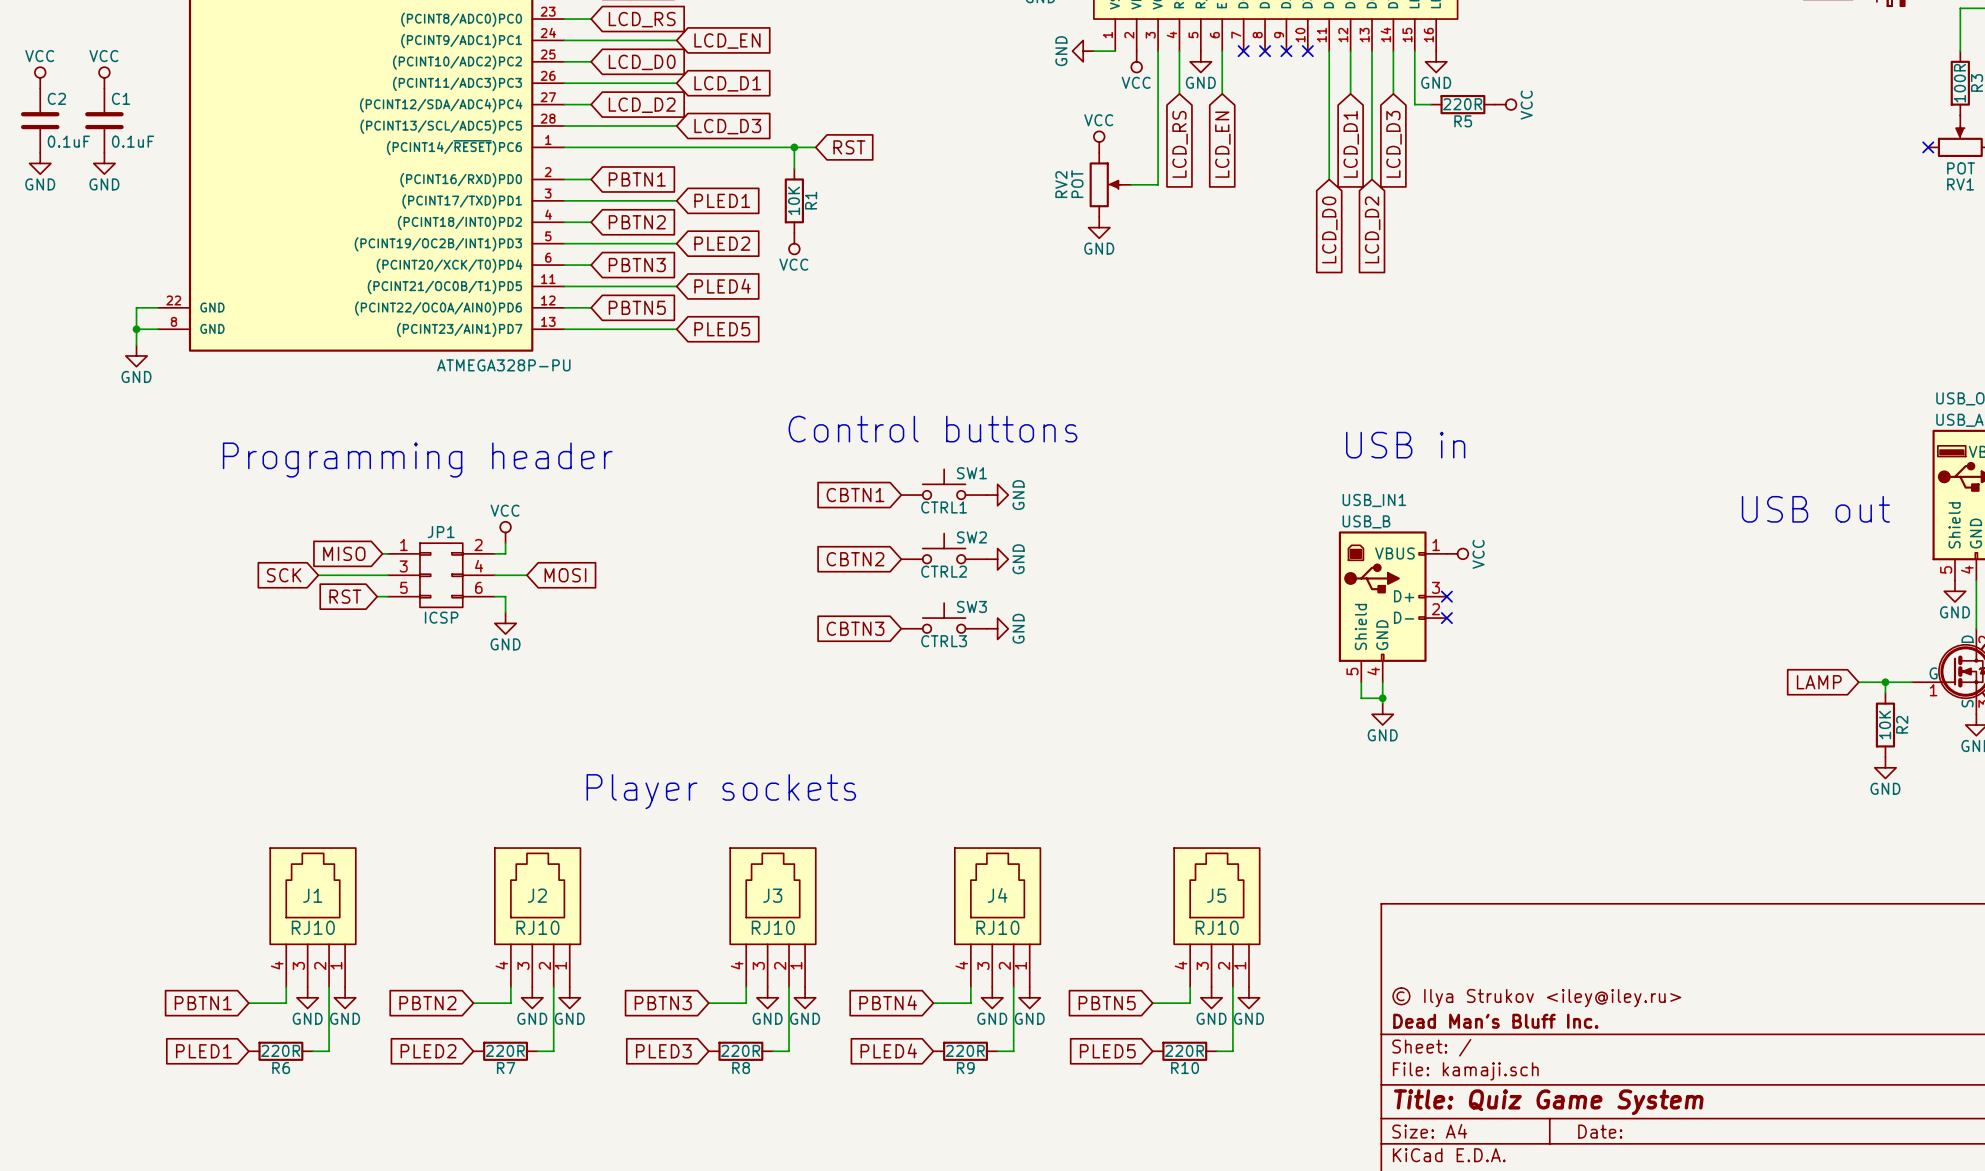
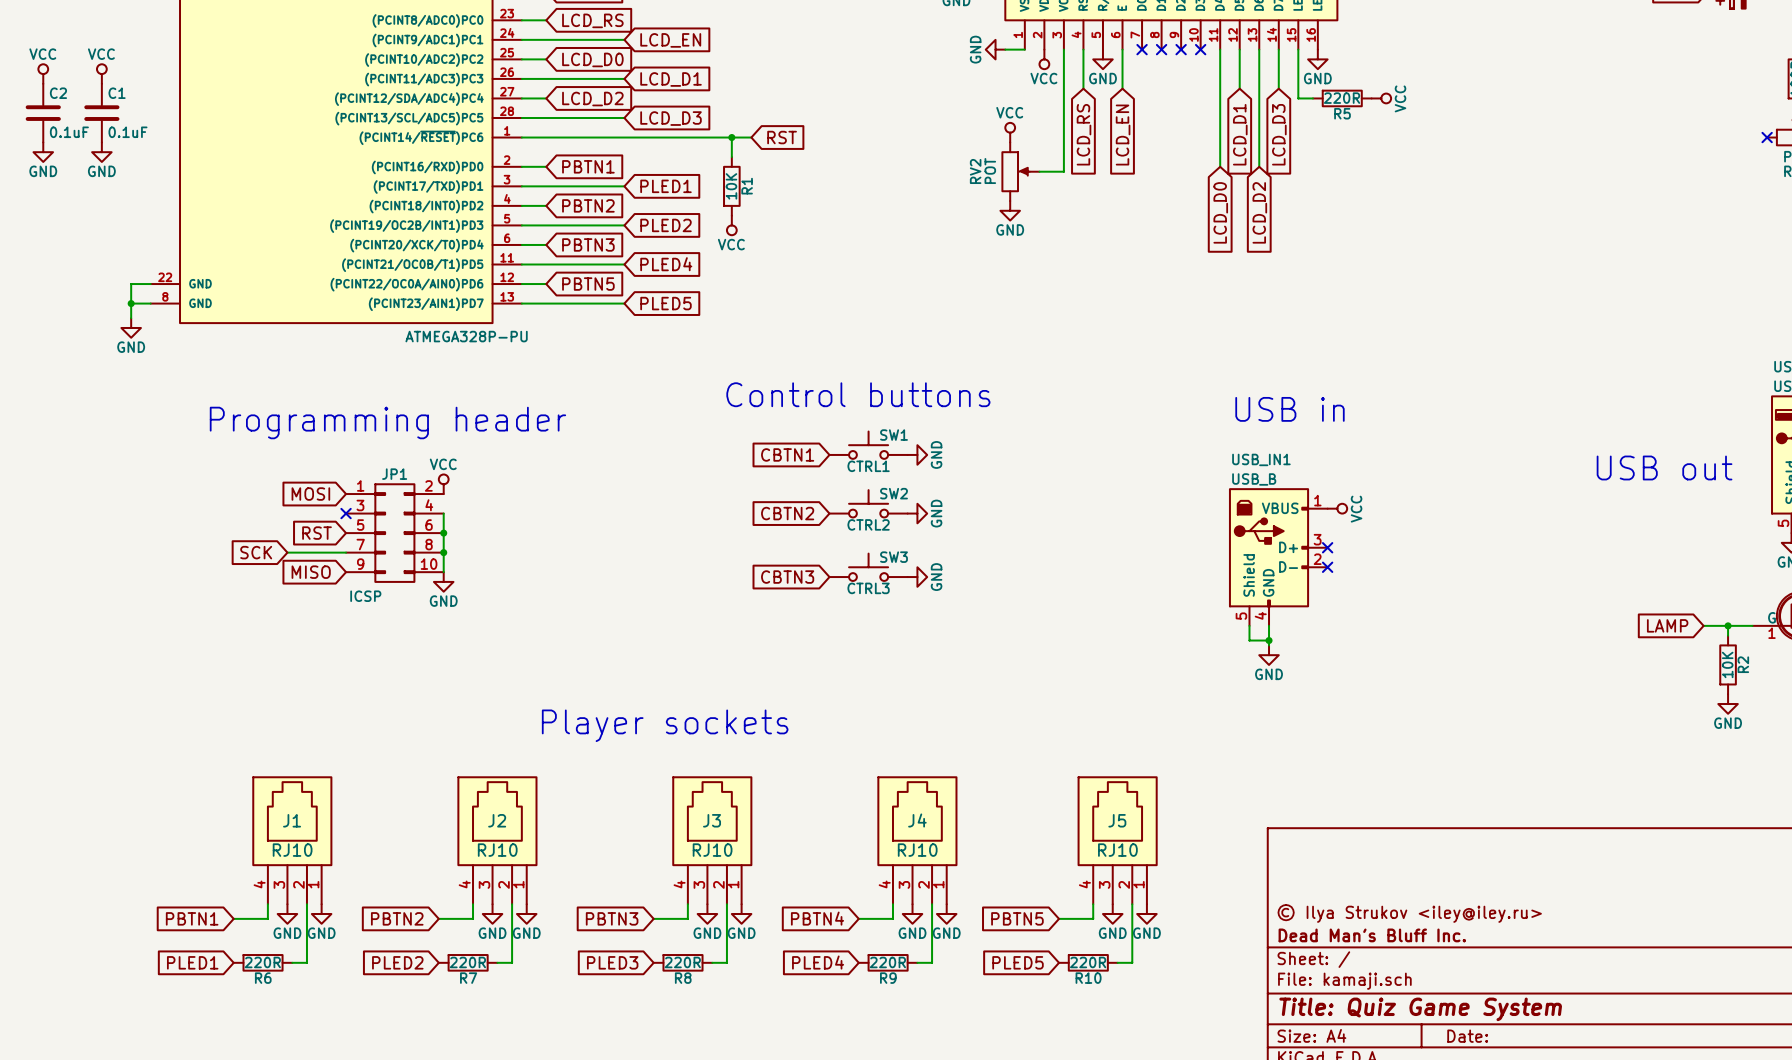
JP1 name position: JP1 (441, 532) -> JP1 (394, 474)
power symbol position: VCC (505, 532) -> VCC (443, 484)
JP1 symbol: [387, 543, 495, 608] -> [346, 484, 444, 582]
wire: (505, 543) (505, 553) (494, 553) -> none
global label position: MISO (344, 553) -> MISO (311, 572)
wire: (382, 553) (387, 553) -> none
no-connect mark: none -> (346, 513)
wire: none -> (443, 513) (443, 572)
global label position: SCK (284, 575) -> SCK (256, 552)
wire: (318, 575) (387, 575) -> none
wire: (494, 575) (526, 575) -> none
global label rotation: 0° (565, 575) -> 180° (310, 494)
global label position: MOSI (565, 575) -> MOSI (310, 494)
junction: none -> (443, 533)
global label position: RST (345, 596) -> RST (317, 533)
wire: (377, 596) (387, 596) -> none
wire: (494, 596) (505, 596) (505, 612) -> none
wire: none -> (287, 552) (346, 552)
junction: none -> (443, 552)
JP1 value position: ICSP (441, 617) -> ICSP (365, 596)
power symbol position: GND (505, 623) -> GND (443, 581)

